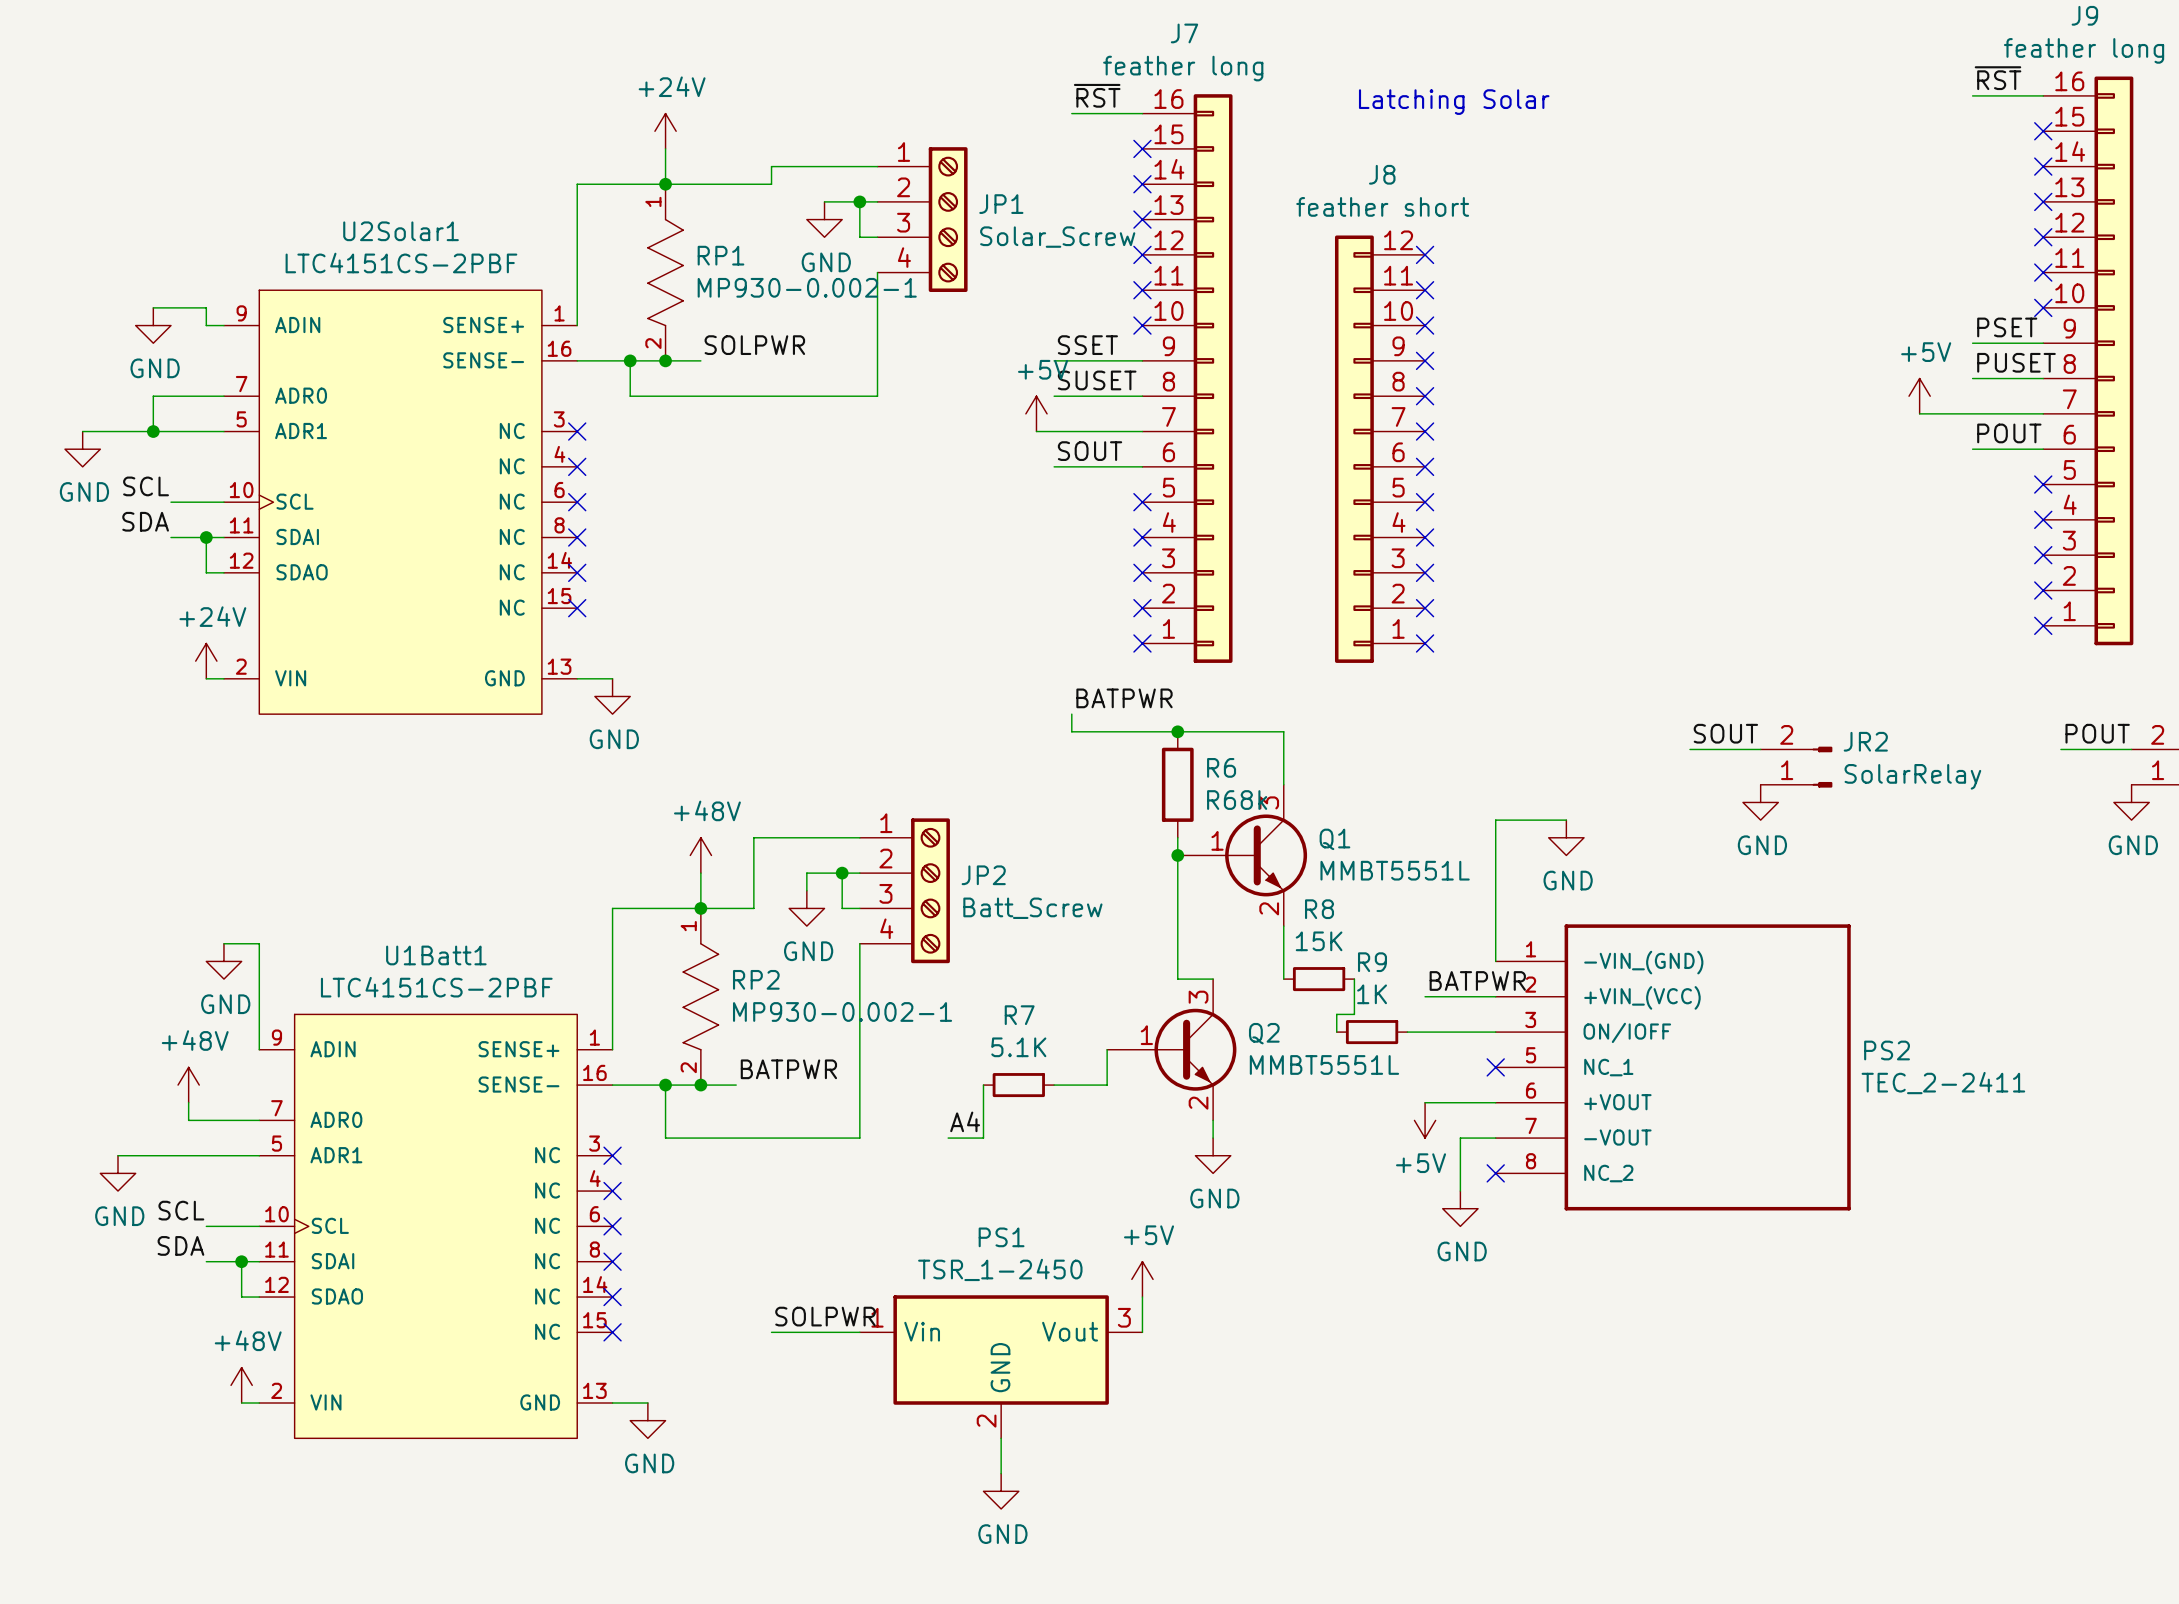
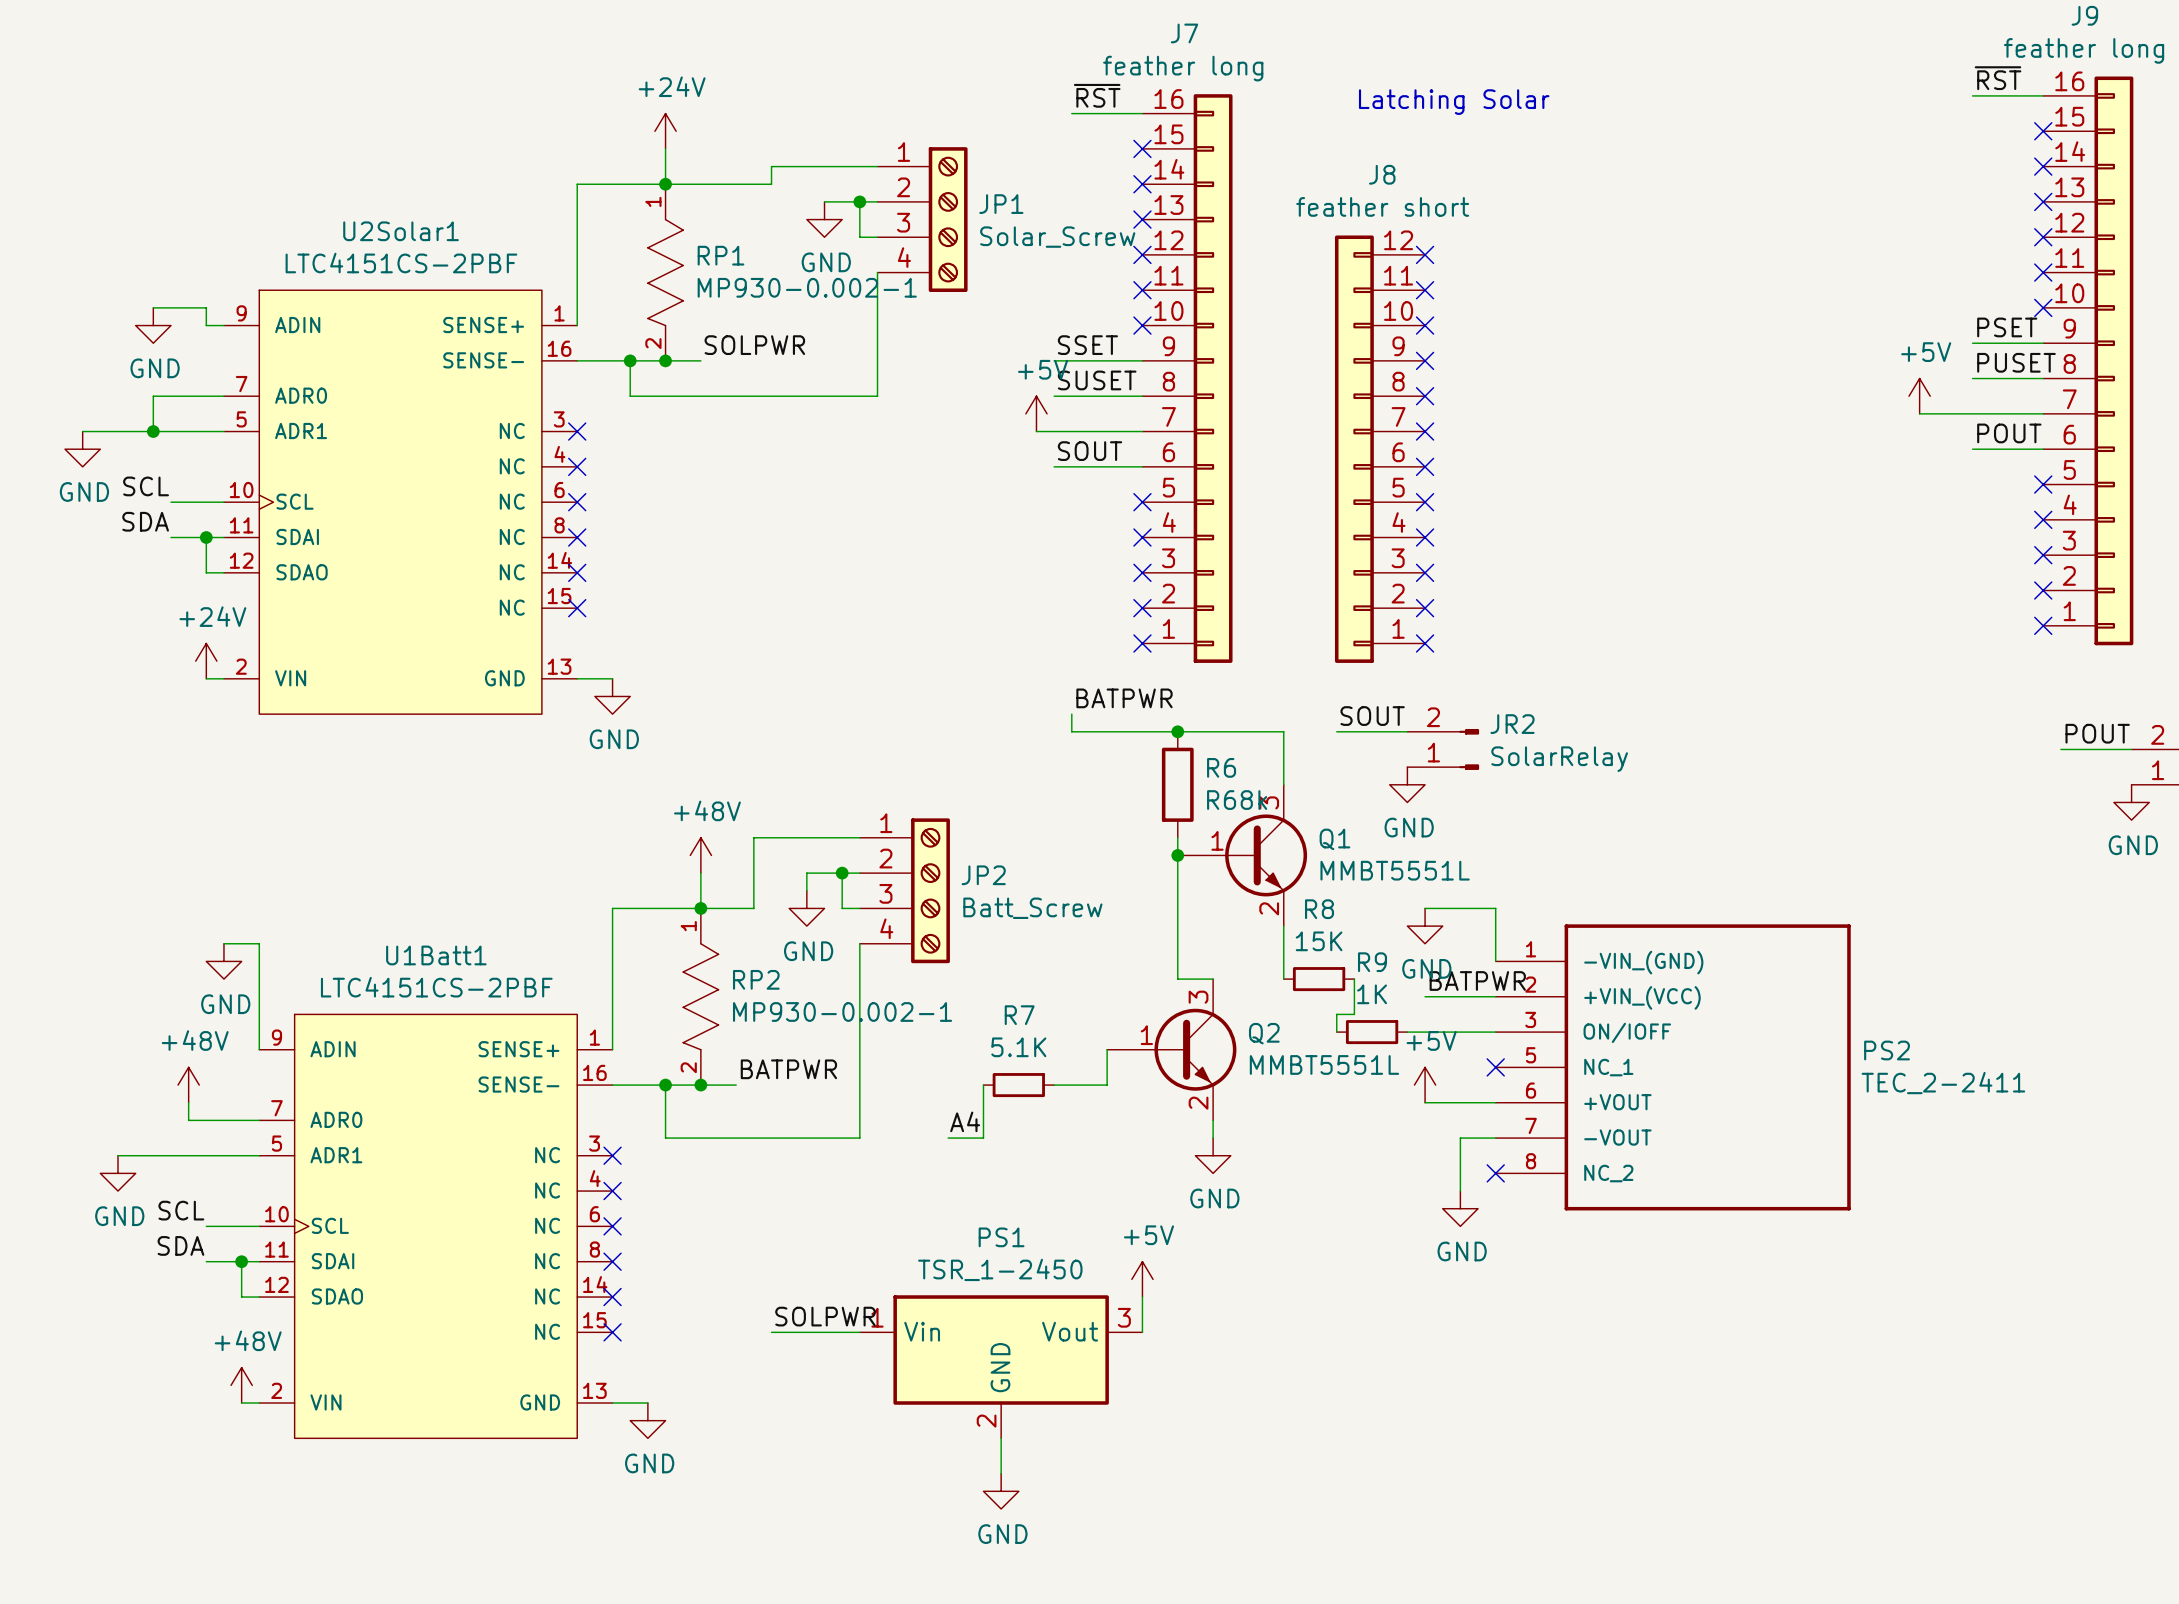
label: none -> SOUT (1372, 716)
wire: none -> (1336, 731) (1407, 731)
label: SOUT (1725, 733) -> none
wire: (1690, 749) (1760, 749) -> none
JR2 position: (1796, 767) -> (1443, 749)
power symbol: none -> GND (1407, 784)
power symbol: GND (1760, 802) -> none
wire: (1566, 820) (1495, 820) (1495, 908) -> (1425, 908) (1495, 908)
power symbol: GND (1566, 837) -> none
power symbol: none -> GND (1425, 926)
power symbol rotation: 0° (1425, 1120) -> 180° (1425, 1085)
power symbol position: +5V (1425, 1120) -> +5V (1425, 1085)

